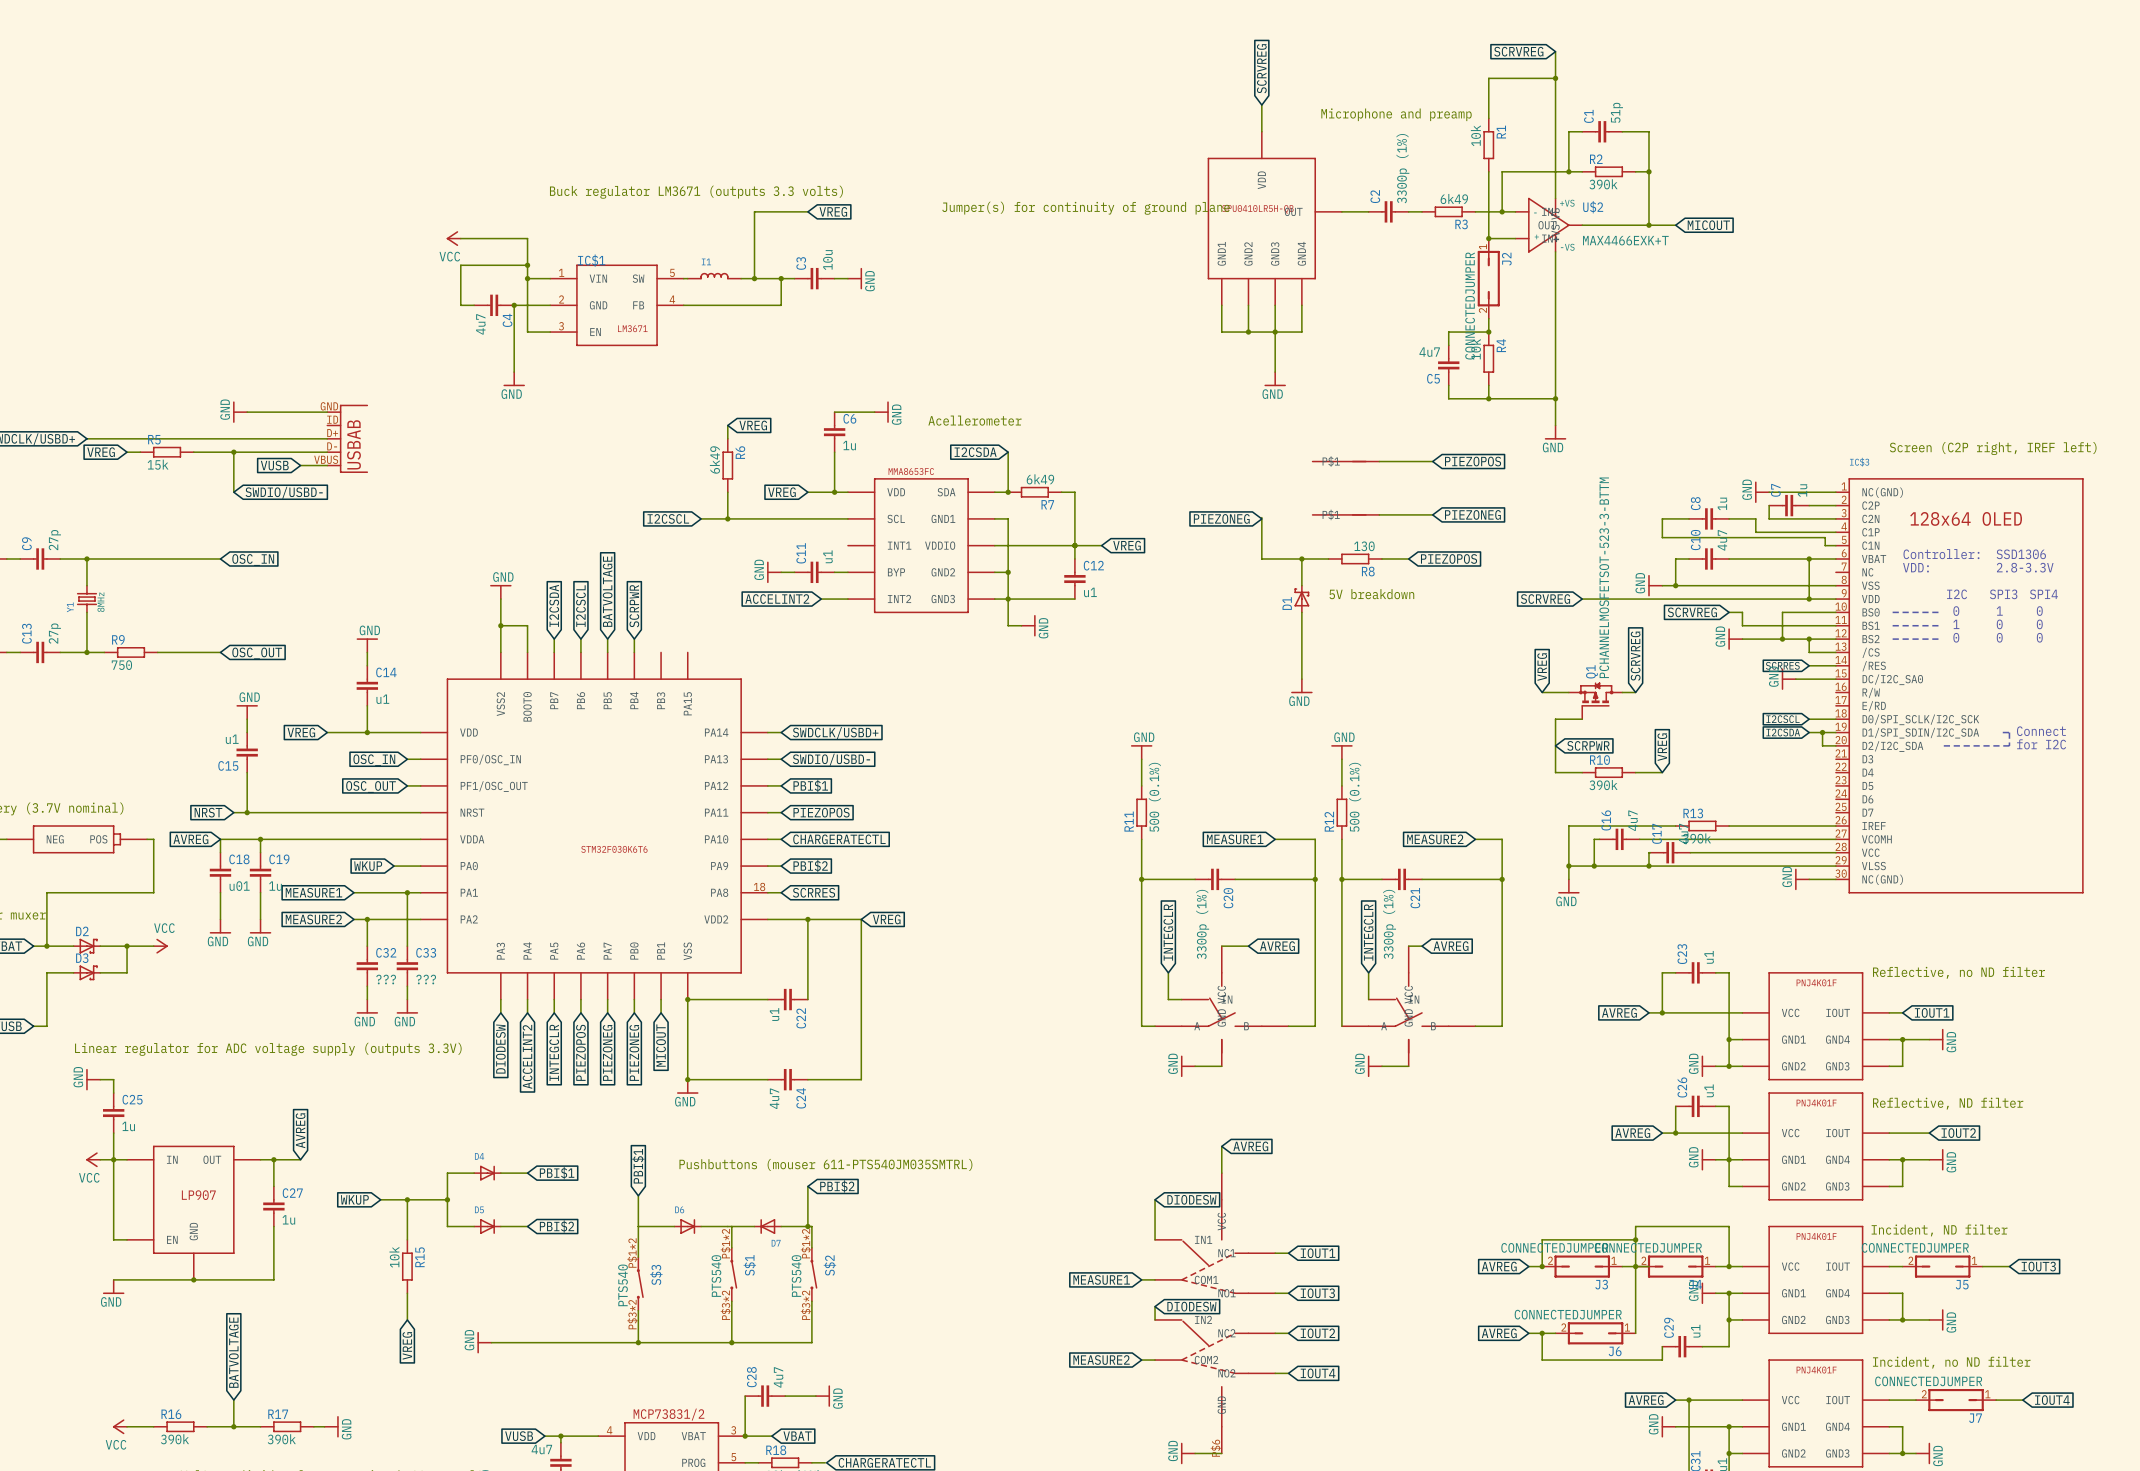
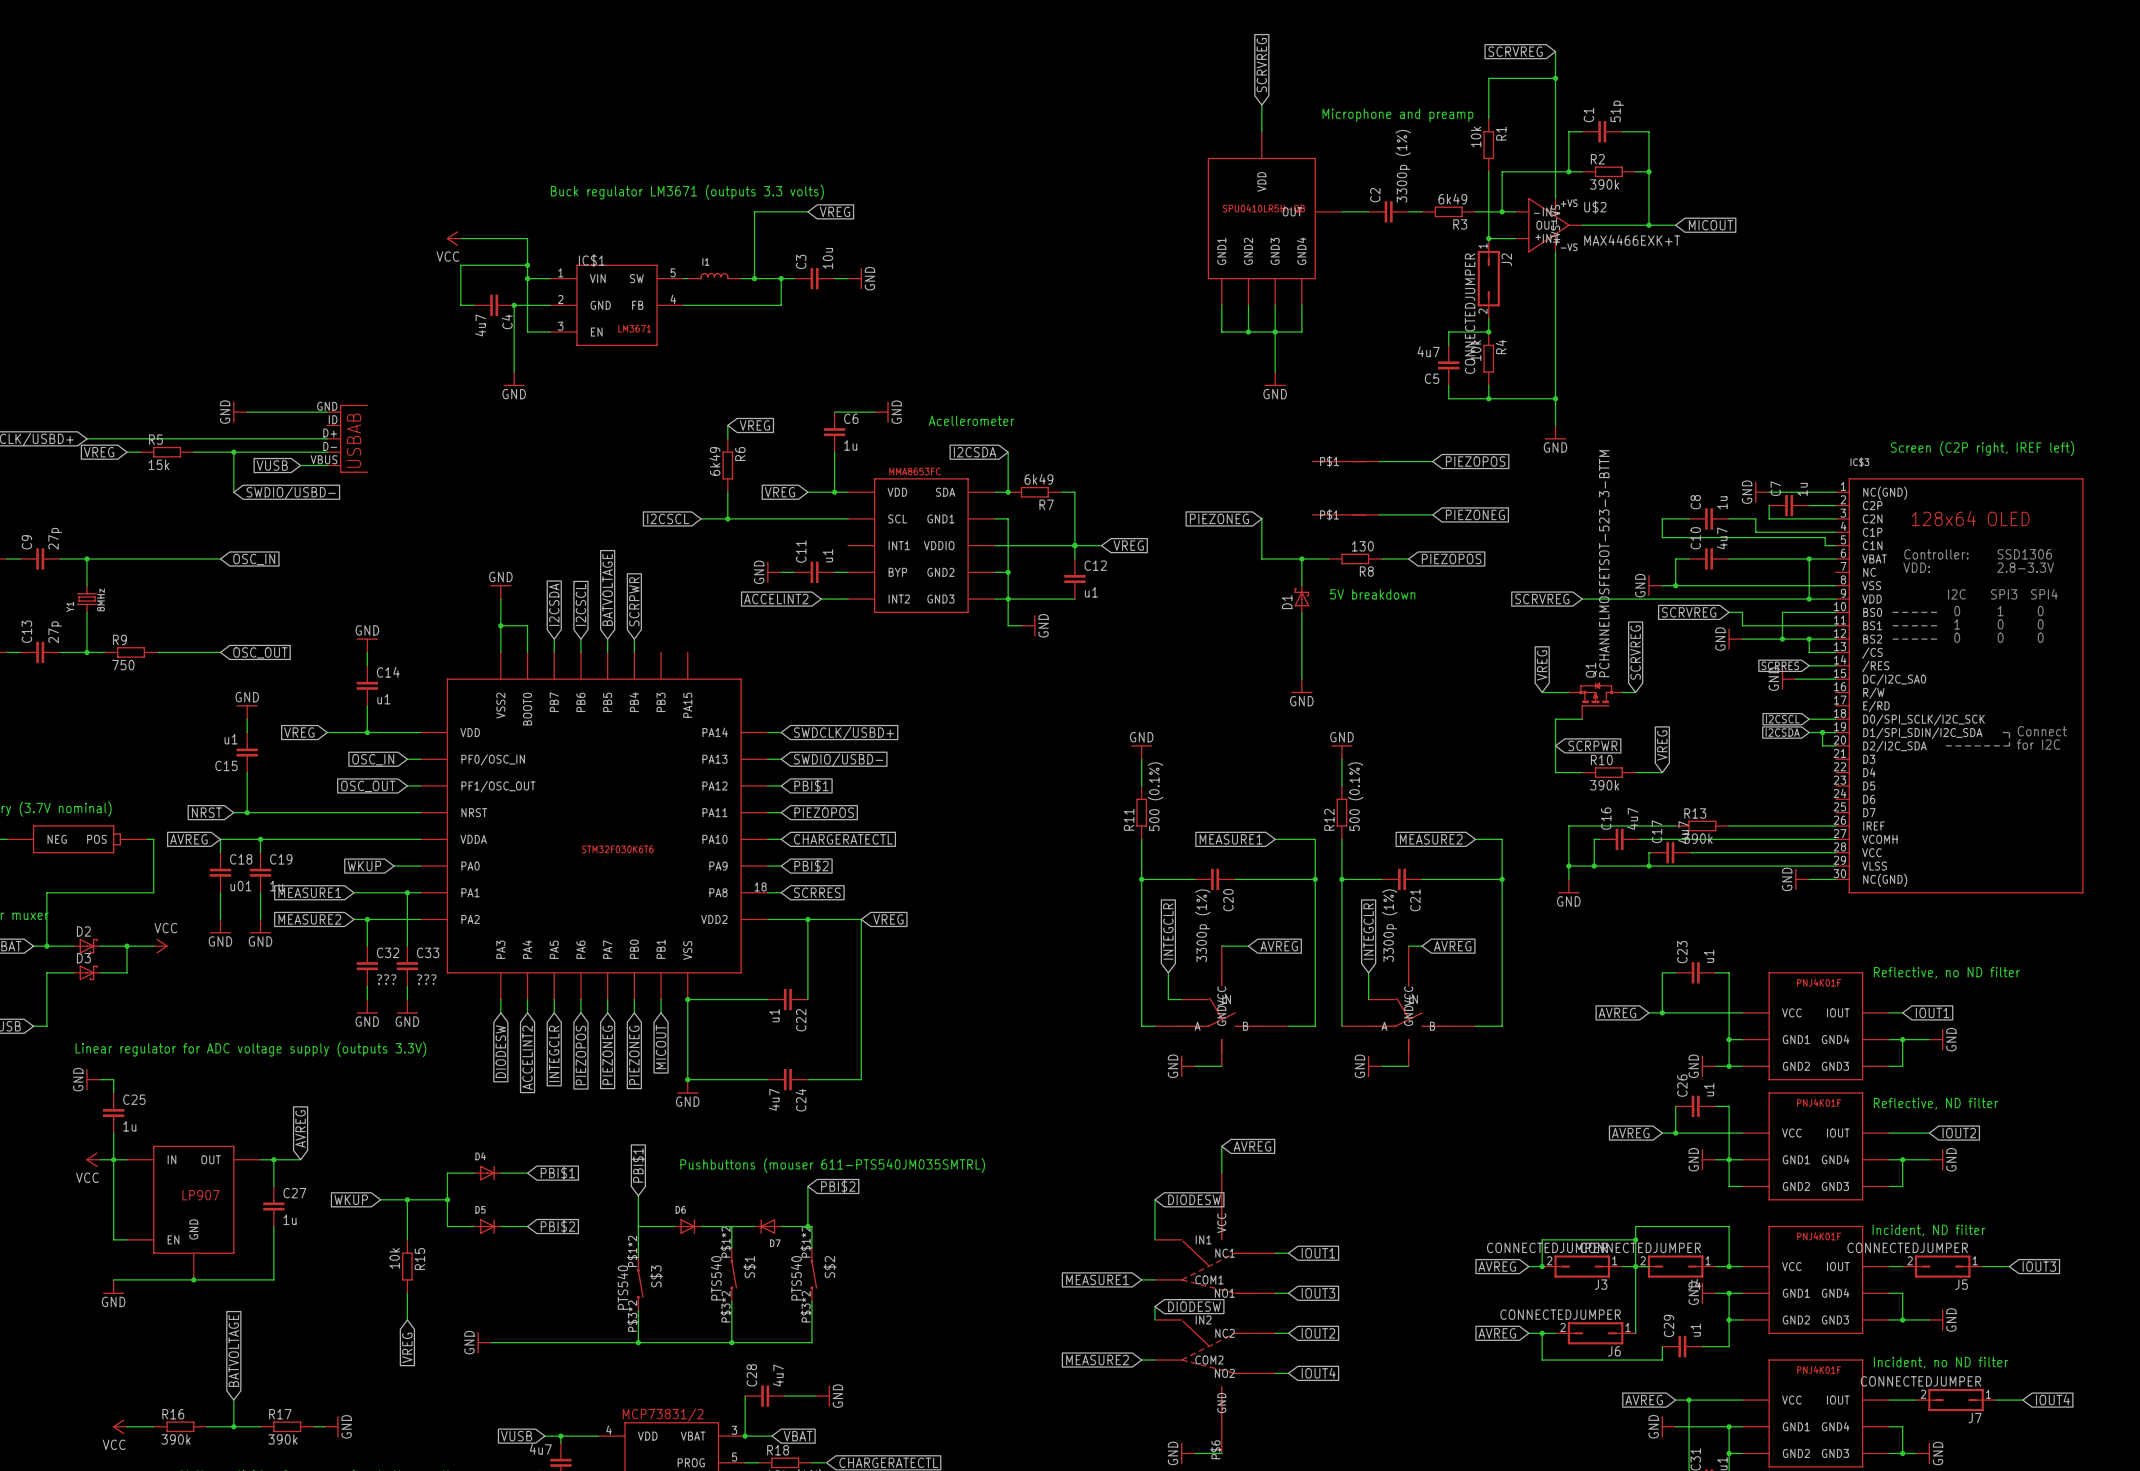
text: Jumper(s) for continuity of ground plane (1086, 208) -> none

